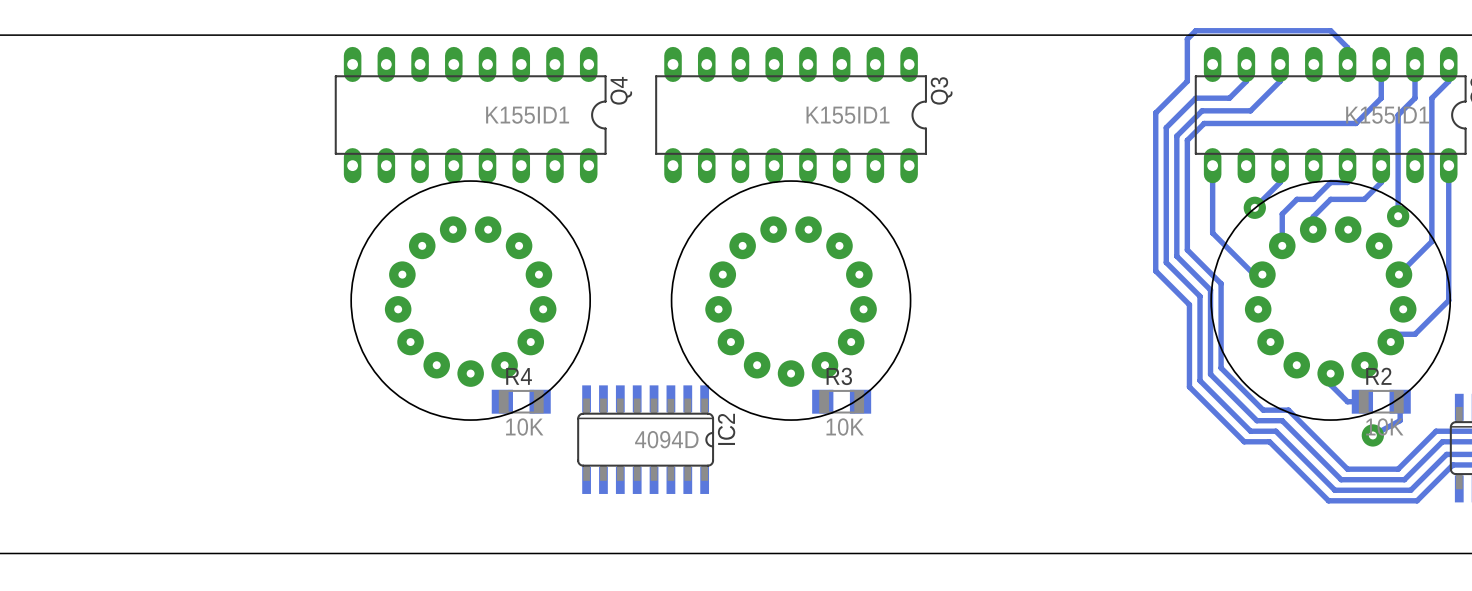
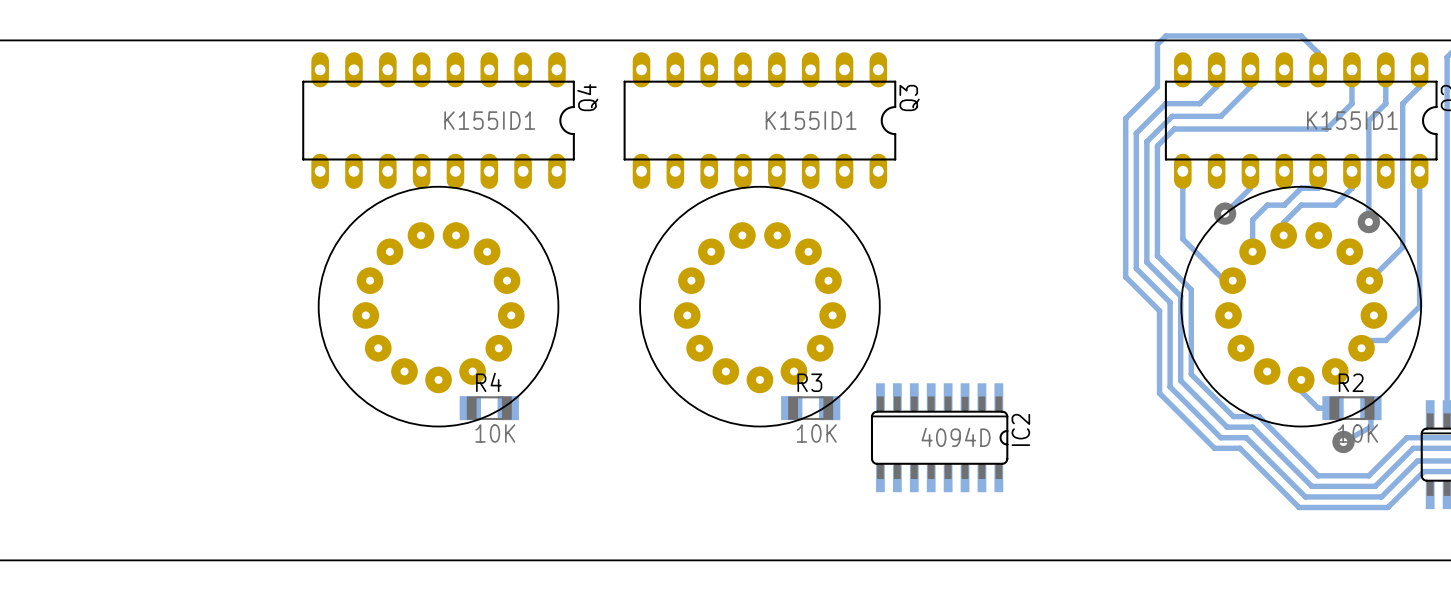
IC2 position: (645, 439) -> (939, 437)

